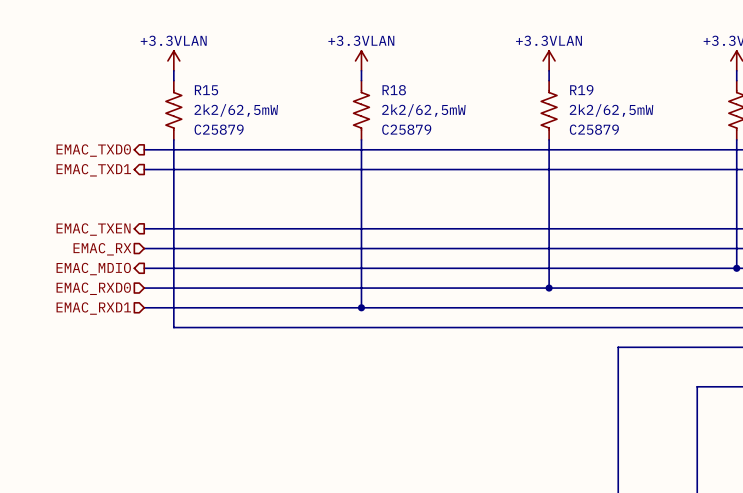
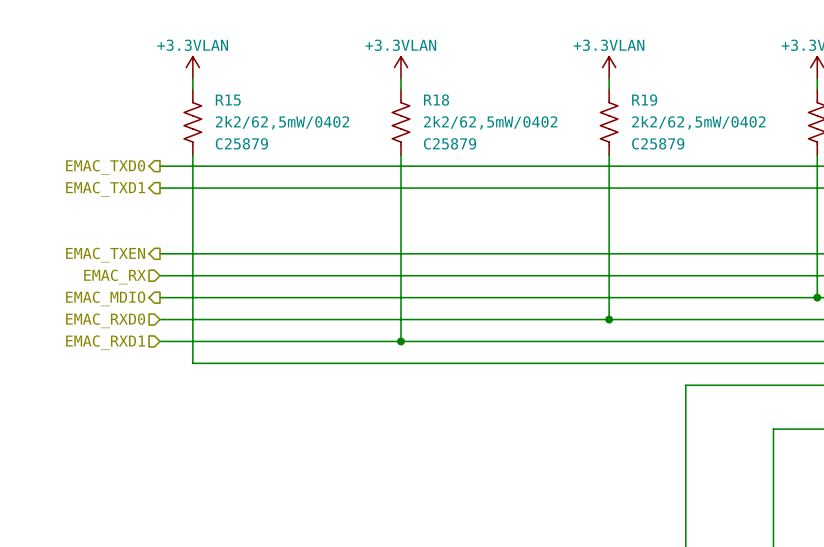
R15 value: 2k2/62,5mW (236, 110) -> 2k2/62,5mW/0402 (282, 122)
R18 value: 2k2/62,5mW (423, 110) -> 2k2/62,5mW/0402 (490, 122)
R19 value: 2k2/62,5mW (611, 110) -> 2k2/62,5mW/0402 (698, 122)

